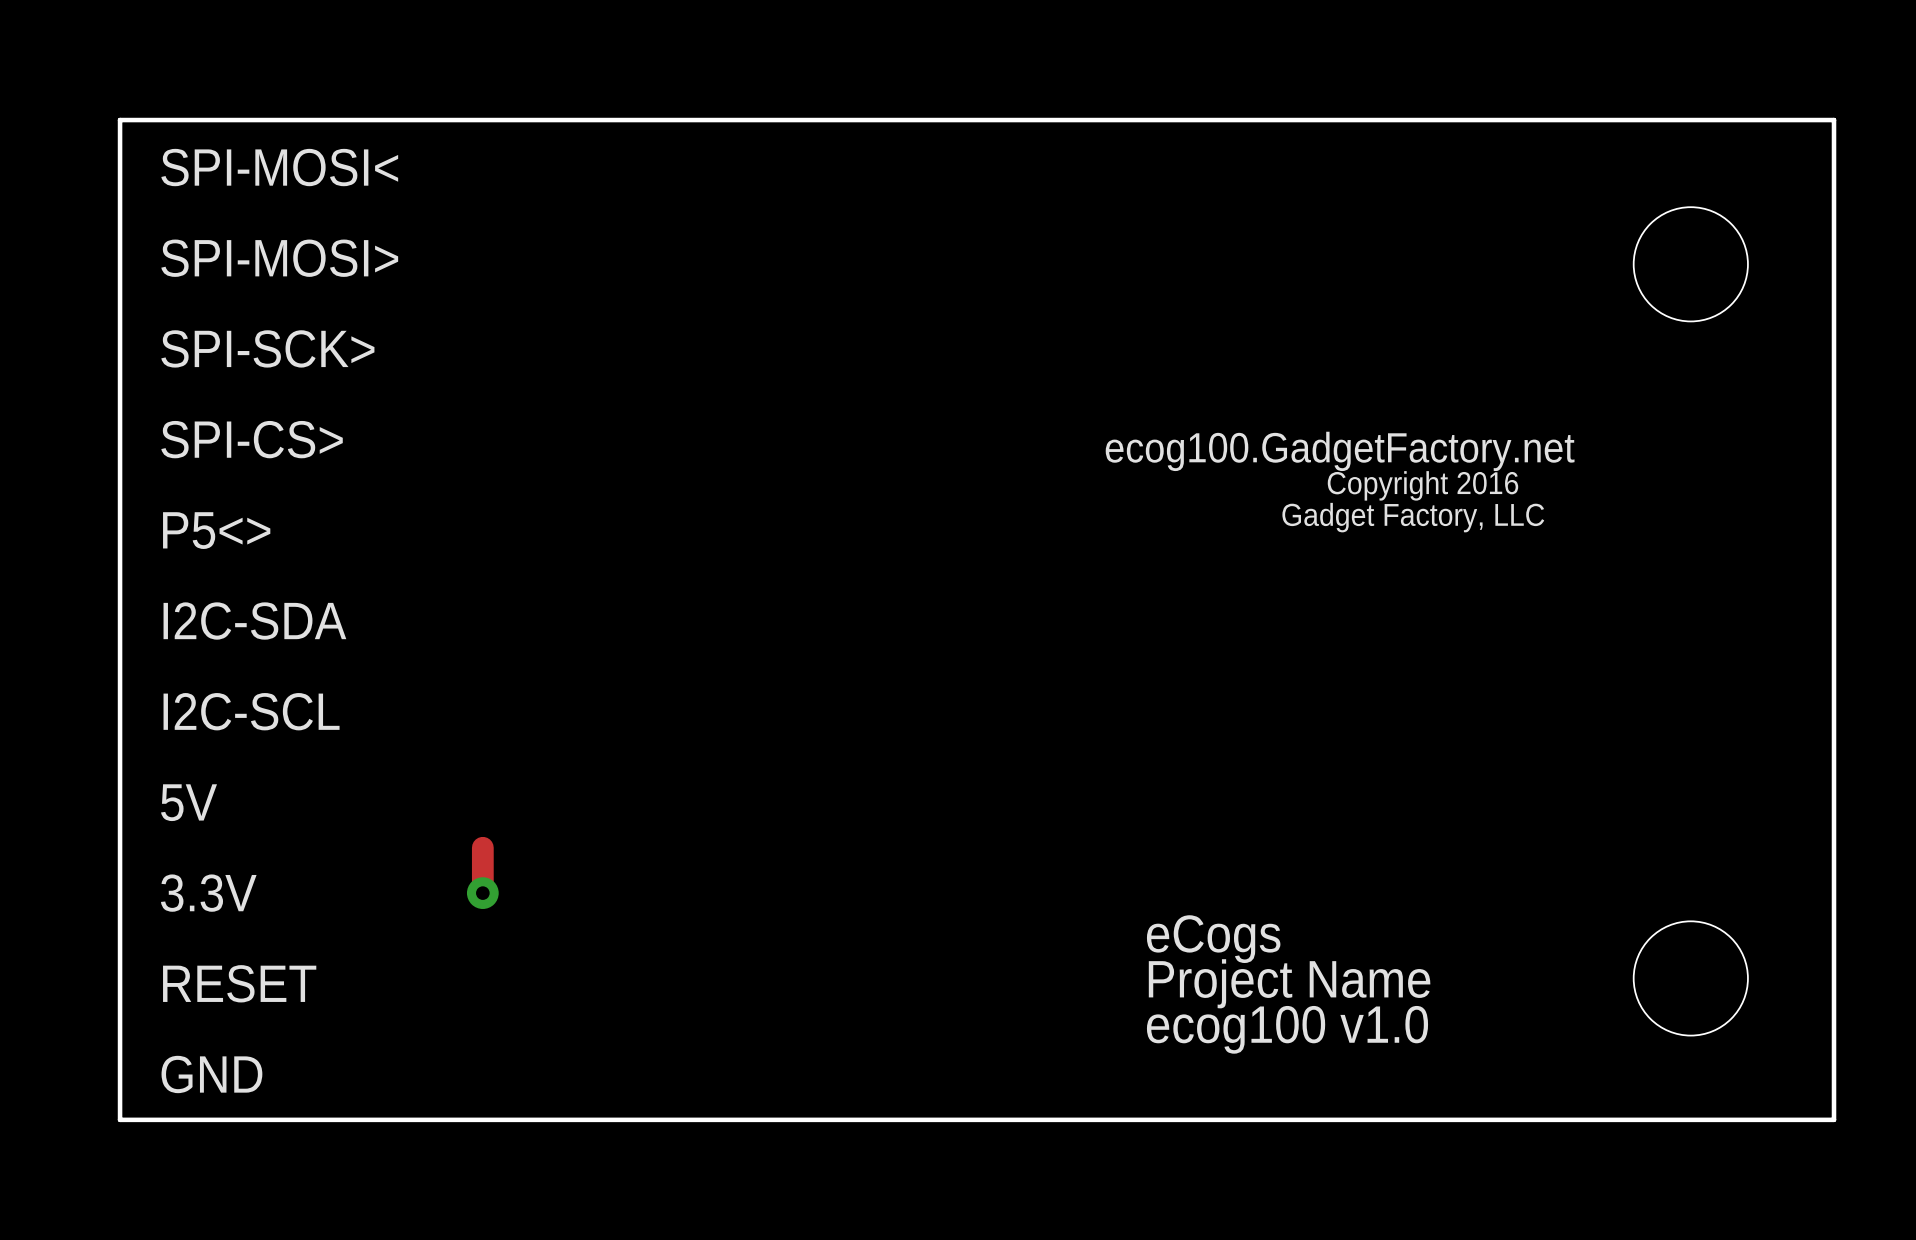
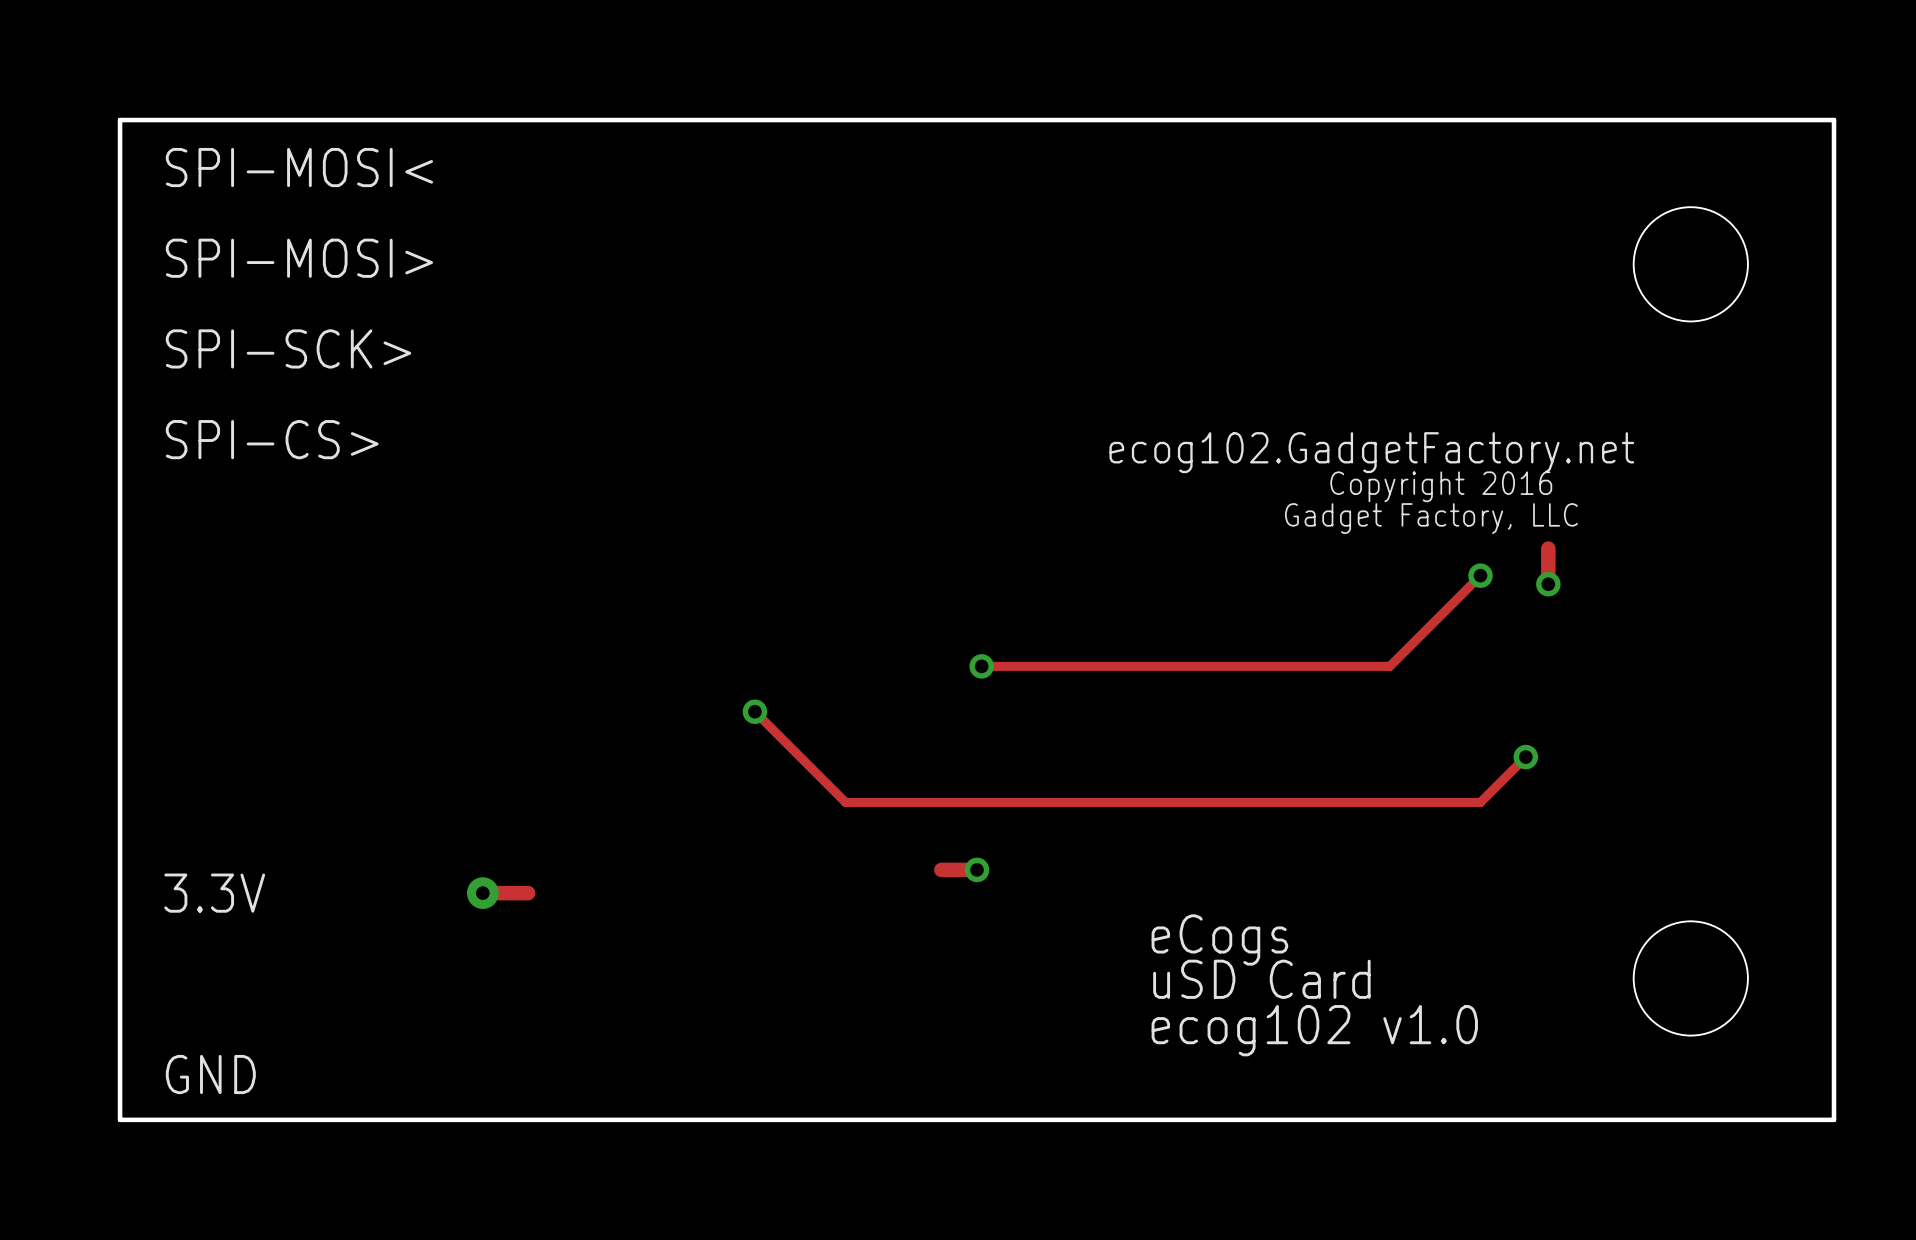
text: ecog100.GadgetFactory.net (1340, 451) -> ecog102.GadgetFactory.net (1371, 452)
text: P5<> (216, 530) -> none
track: none -> (1548, 548) (1548, 584)
track: none -> (1480, 575) (1389, 666) (981, 666)
via: none -> (1480, 575)
via: none -> (1548, 584)
text: I2C-SDA (254, 621) -> none
via: none -> (981, 666)
text: I2C-SCL (251, 711) -> none
track: none -> (754, 711) (845, 802) (1480, 802) (1525, 757)
via: none -> (754, 711)
via: none -> (1525, 757)
text: 5V (189, 802) -> none
track: (482, 847) (482, 893) -> (528, 893) (482, 893)
track: none -> (941, 869) (977, 869)
via: none -> (977, 869)
text: RESET (239, 983) -> none
text: Project Name (1289, 983) -> uSD Card (1261, 979)
text: ecog100 v1.0 (1287, 1029) -> ecog102 v1.0 (1314, 1030)

